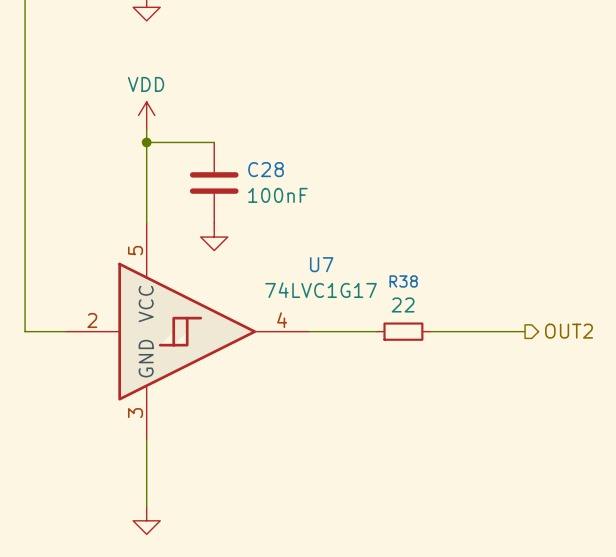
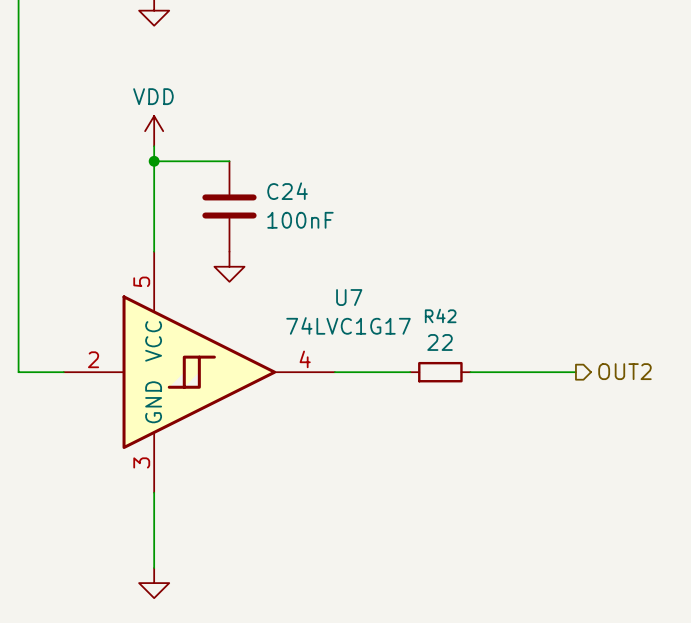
C28 name: C28 (266, 169) -> C24 (287, 191)
R38 name: R38 (403, 281) -> R42 (440, 315)

